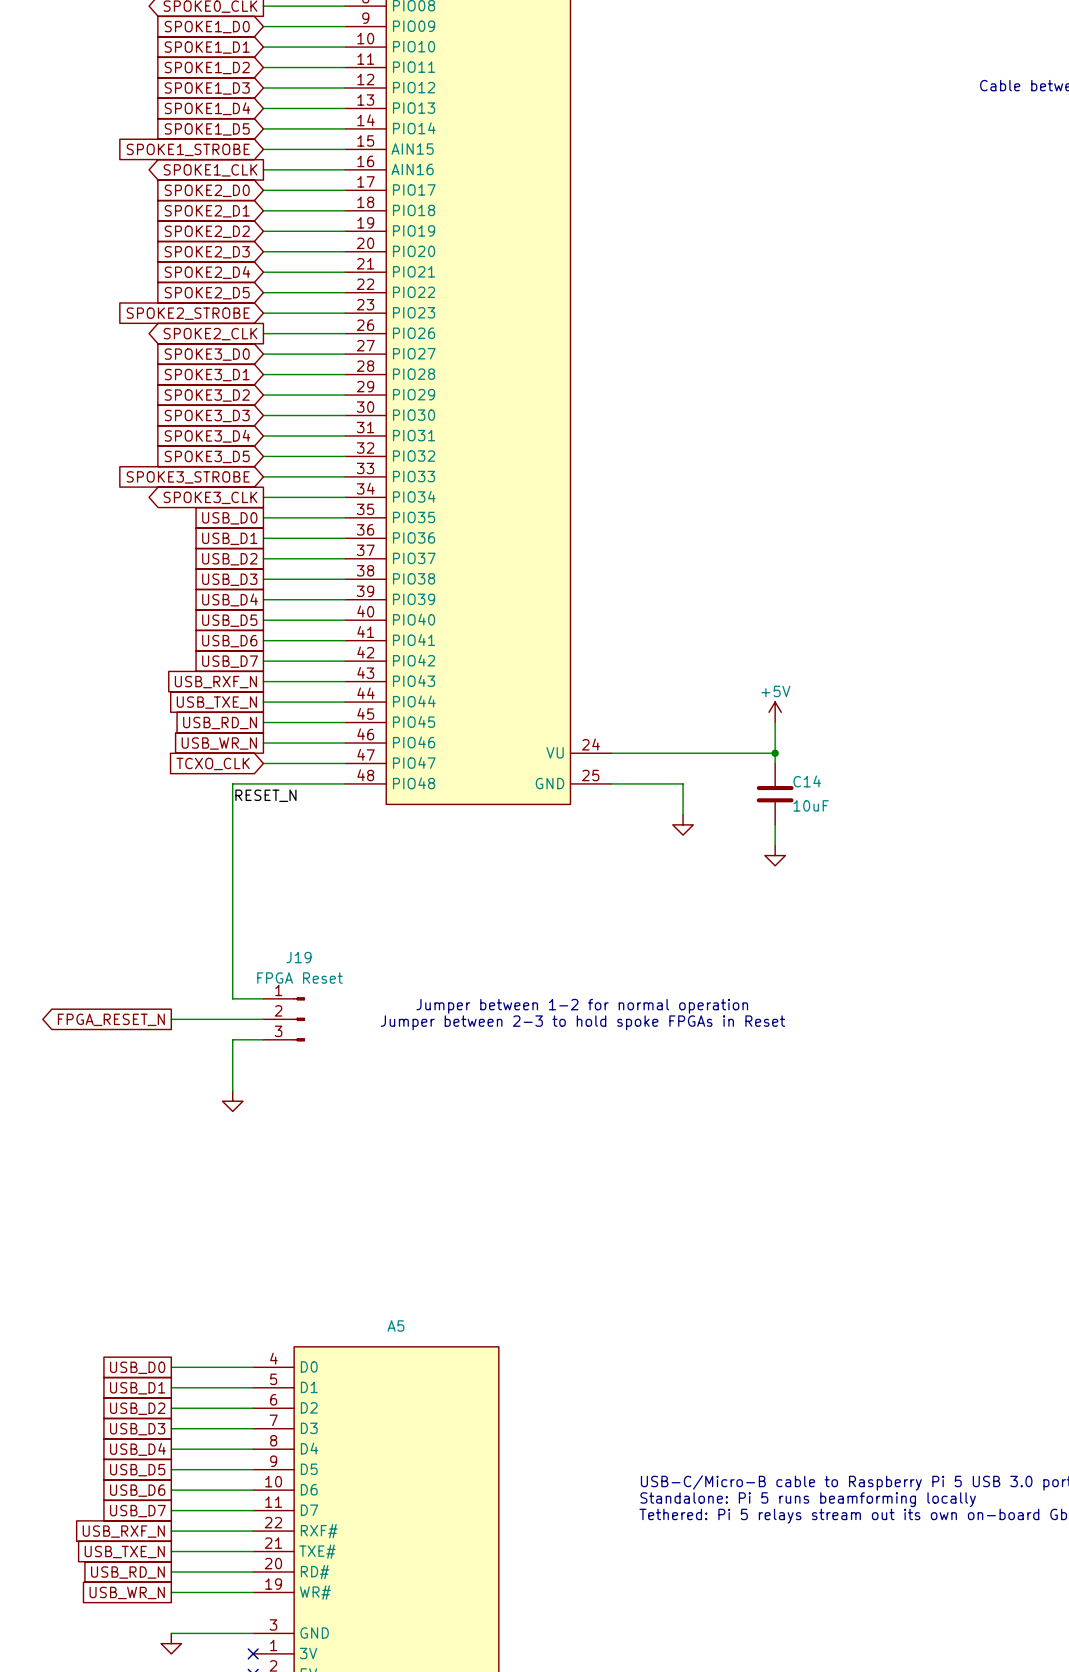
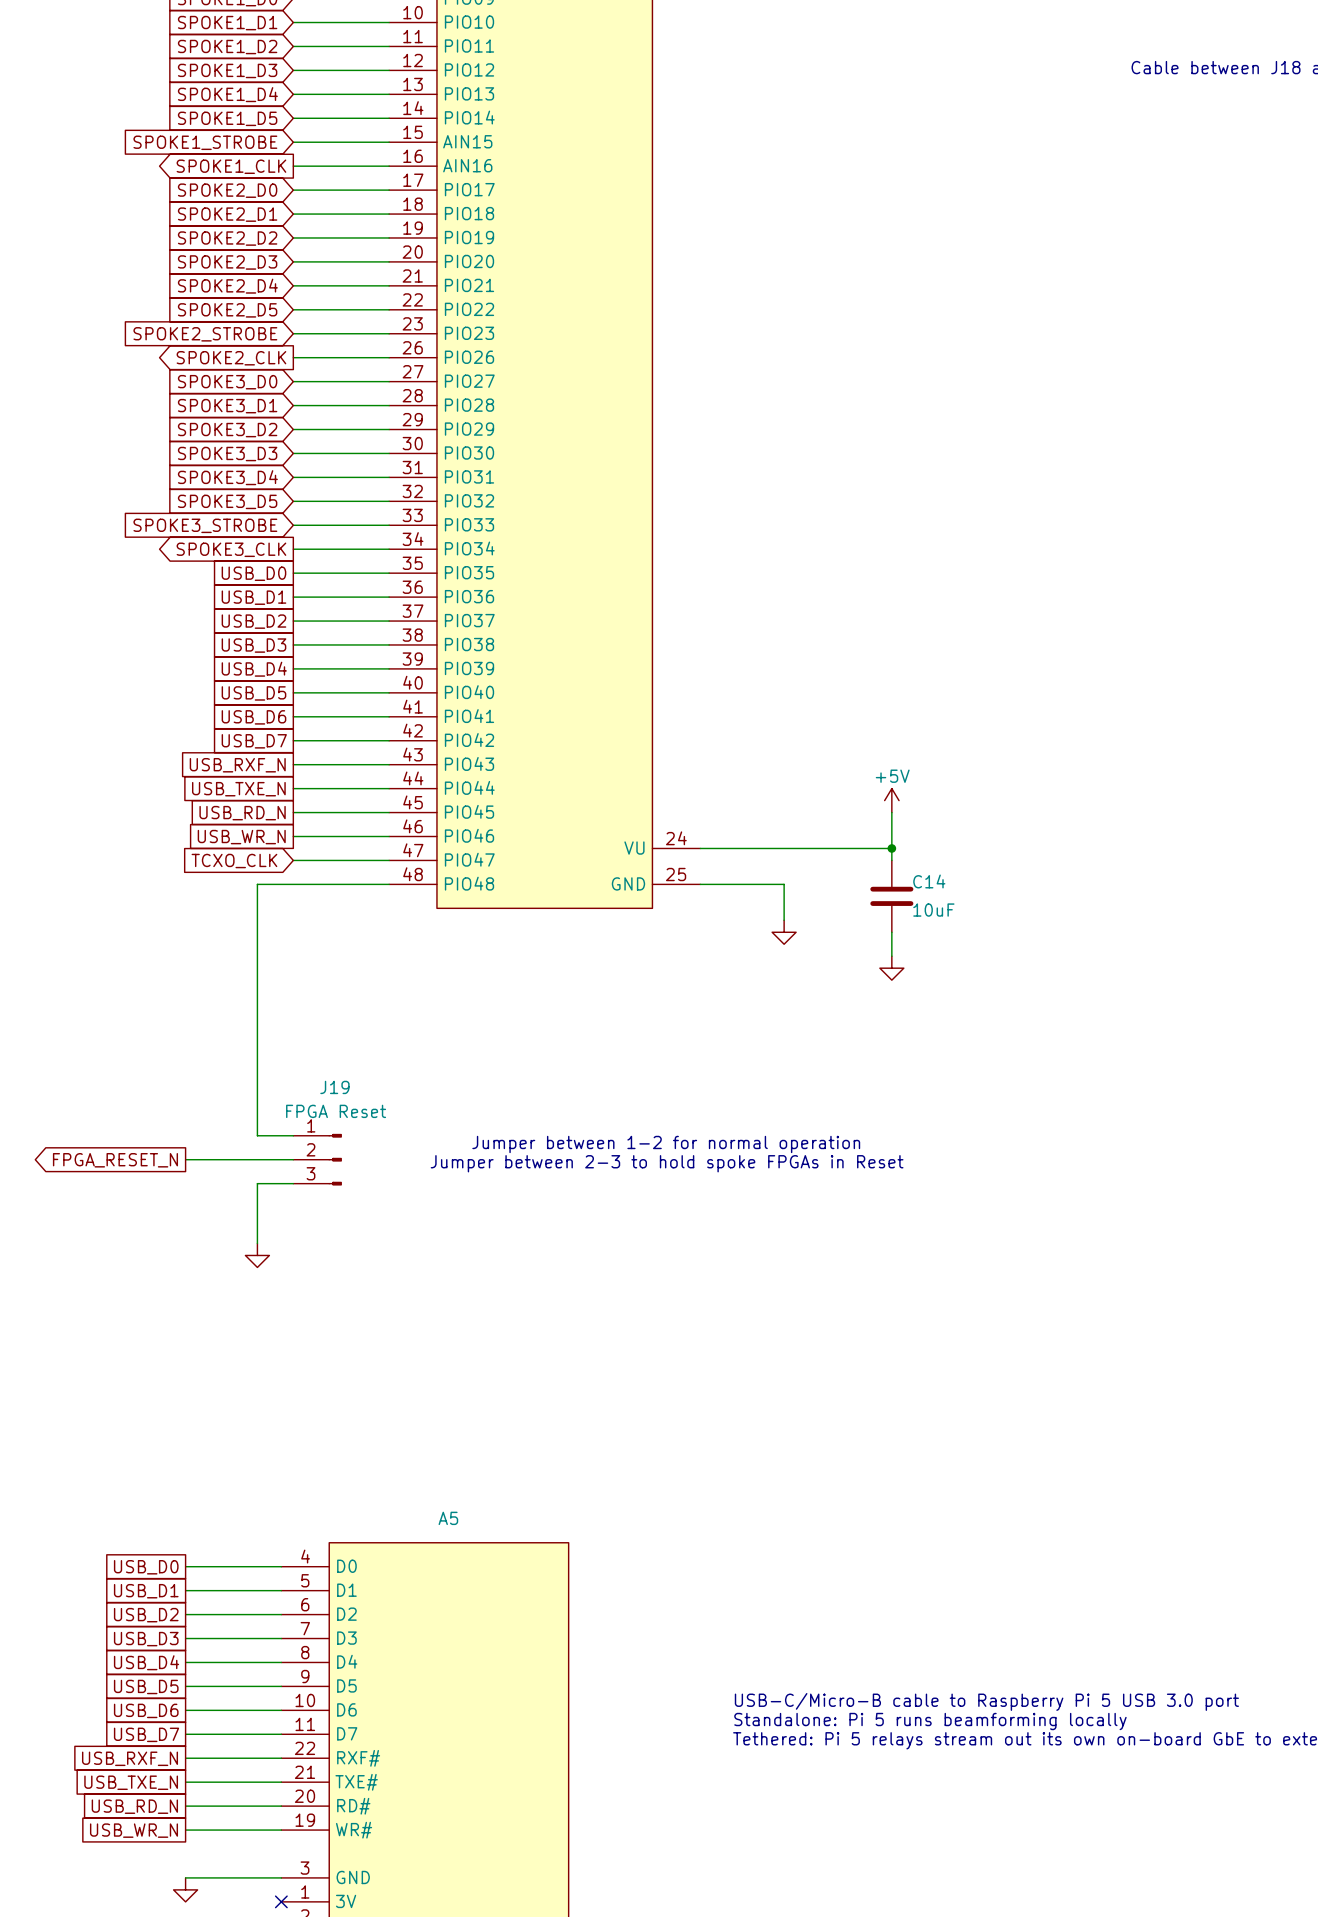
label: RESET_N (265, 795) -> none

